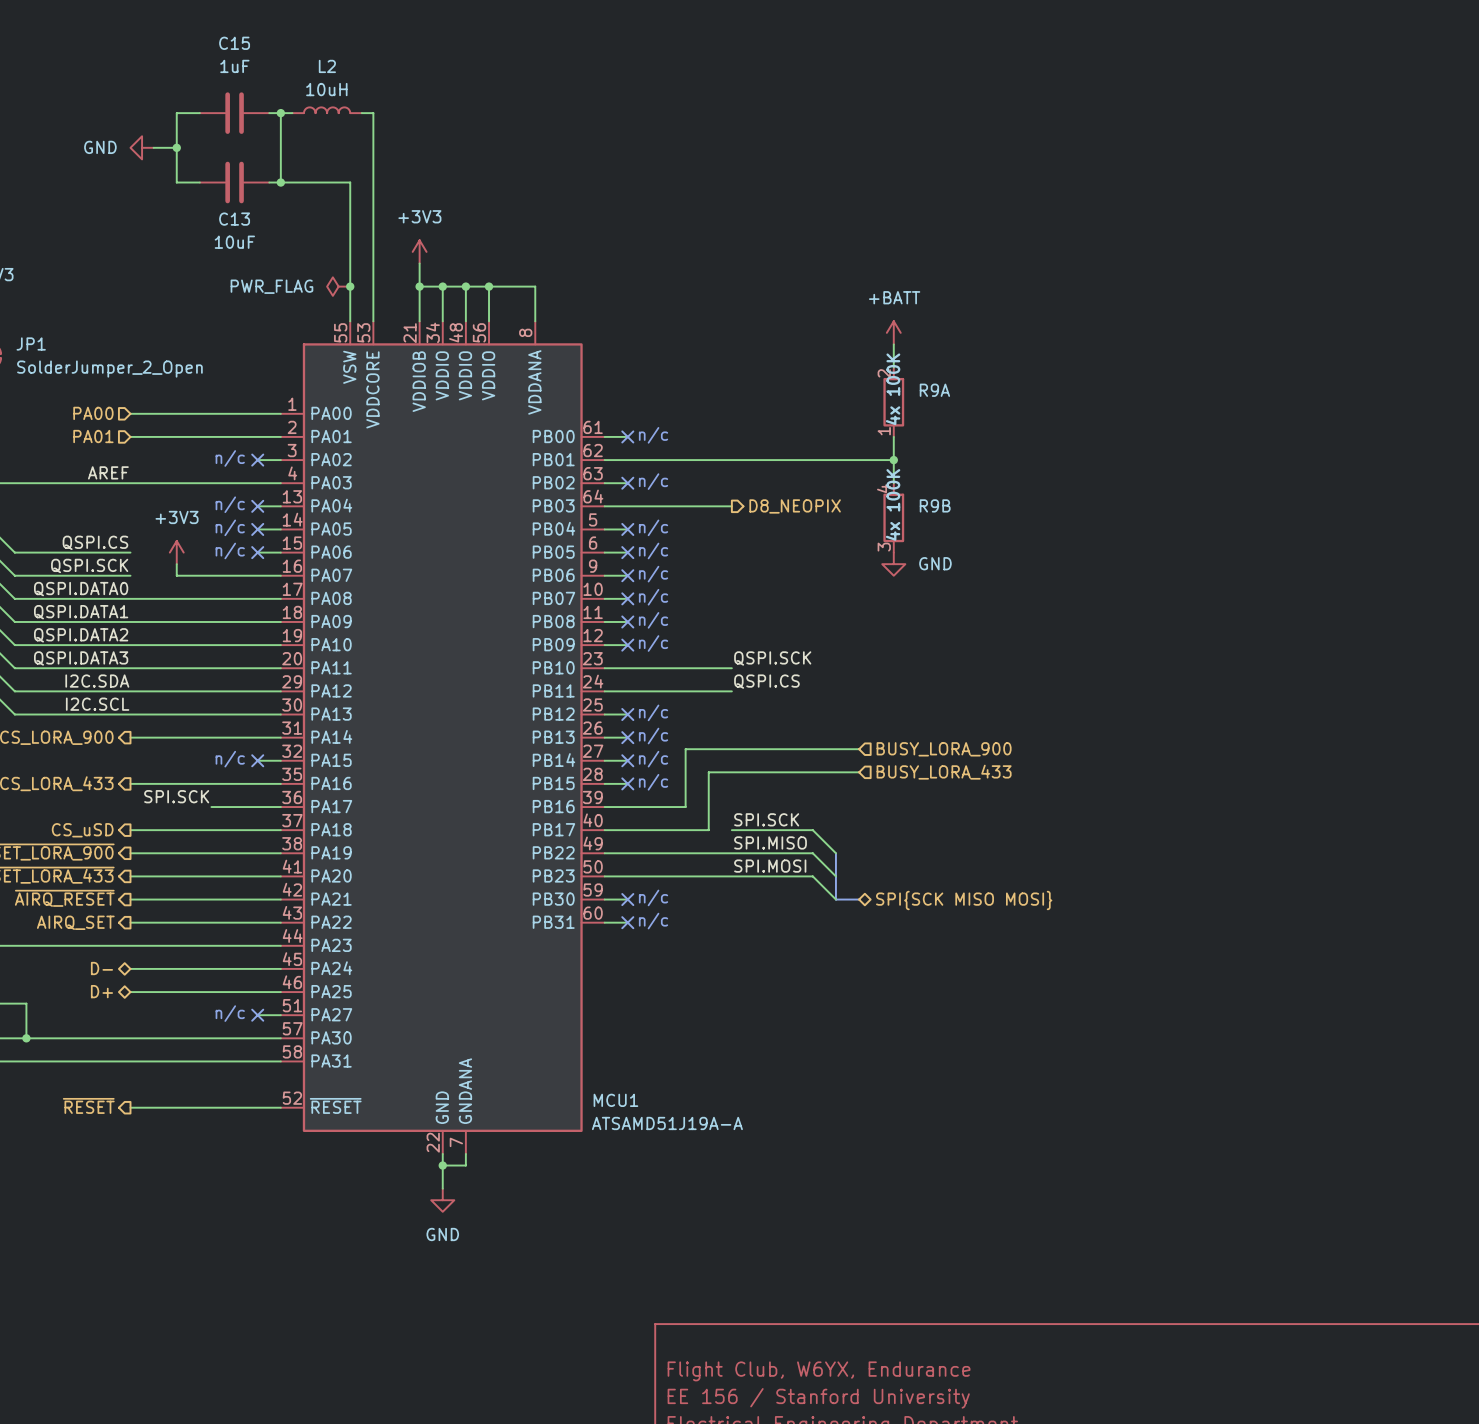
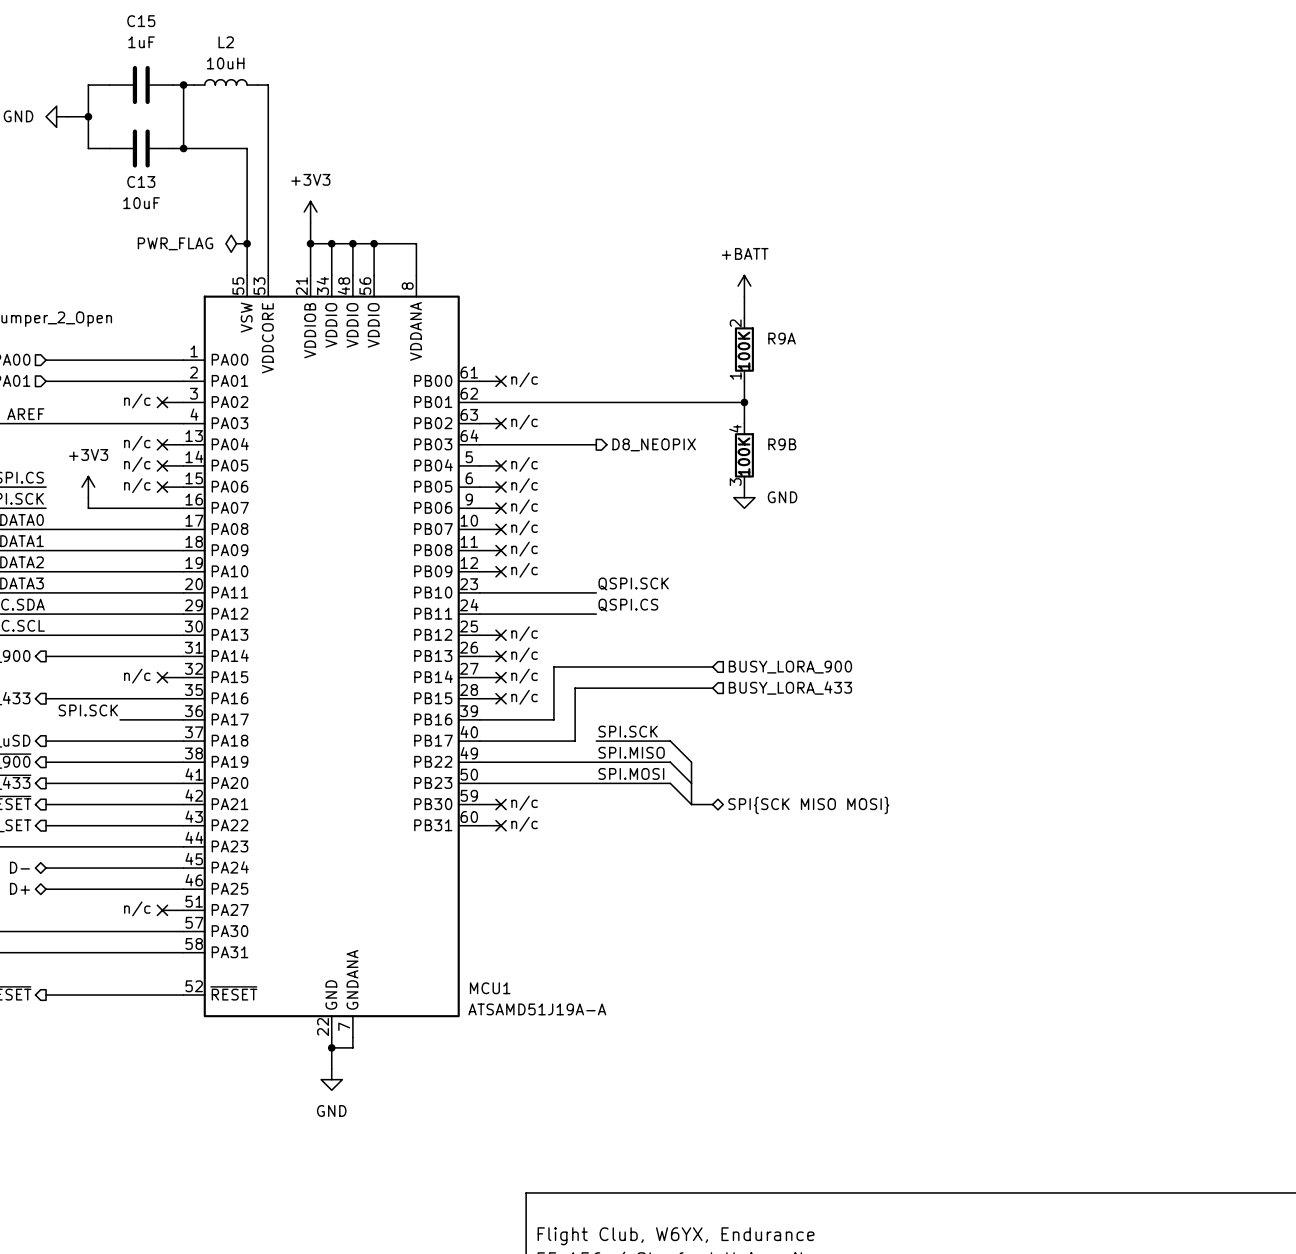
R9A value: 4x 100K (893, 389) -> 100K (744, 351)
R9B value: 4x 100K (893, 504) -> 100K (744, 456)

